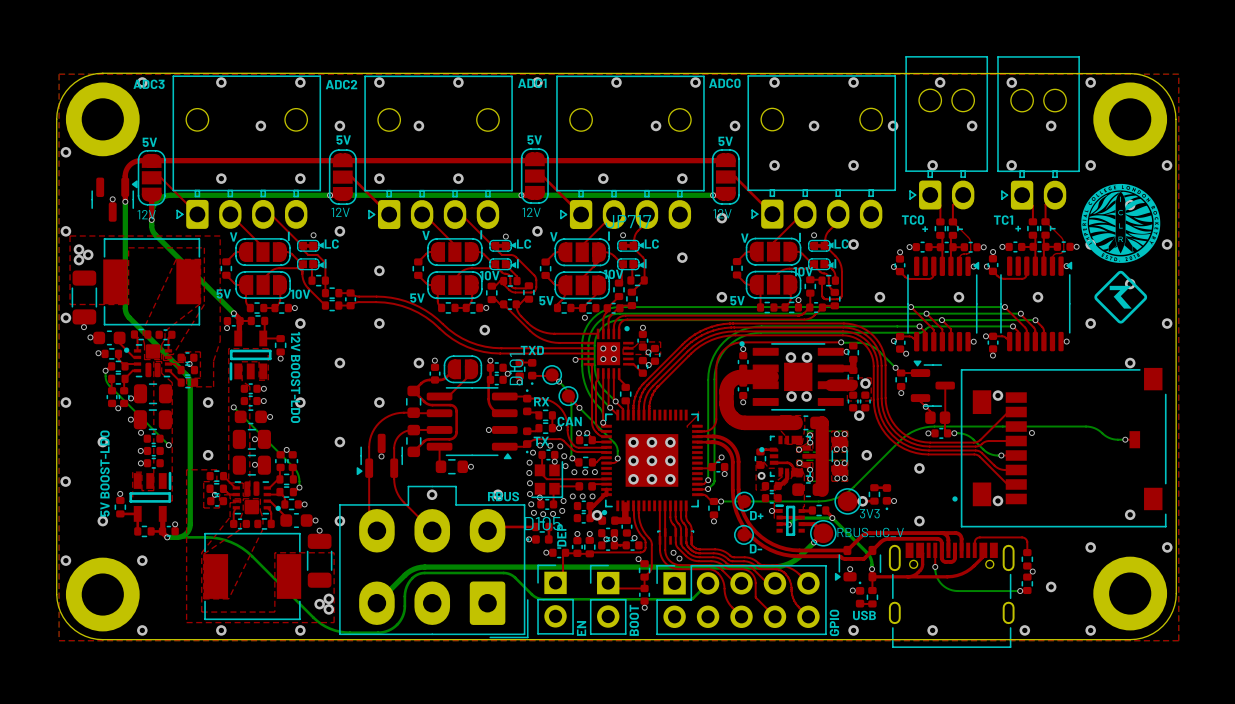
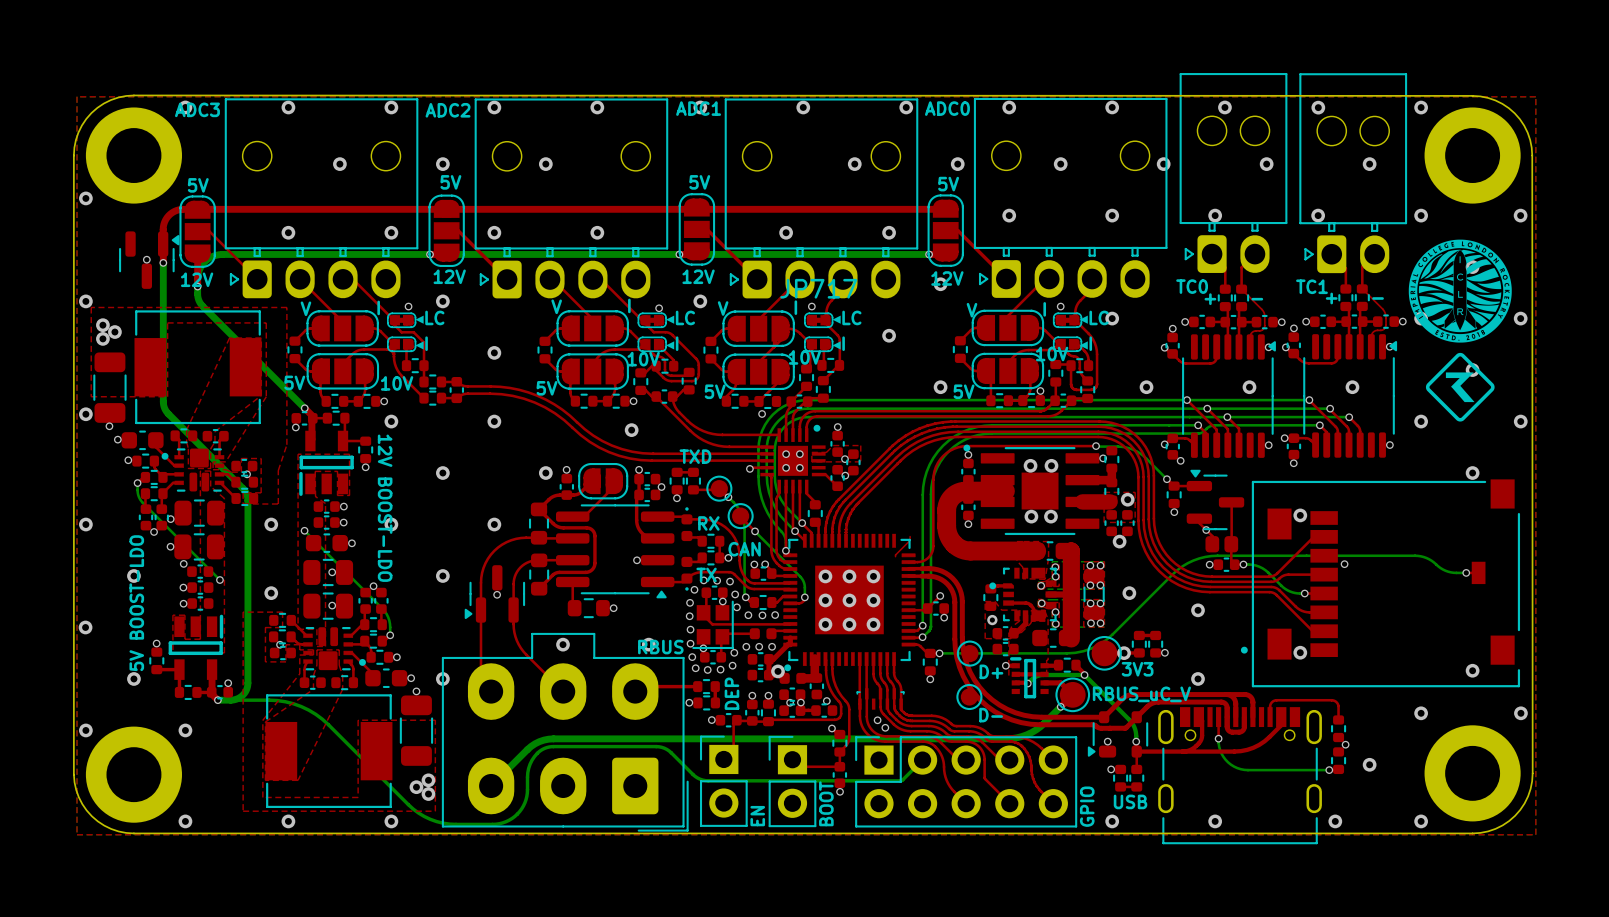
part: none -> (693, 481)
D101: (532, 371) -> none
part footprint: [882, 484, 892, 511] -> [1148, 630, 1164, 658]
D105: (539, 539) -> none
part: none -> (706, 702)
part footprint: [855, 581, 865, 608] -> [1113, 764, 1129, 792]

